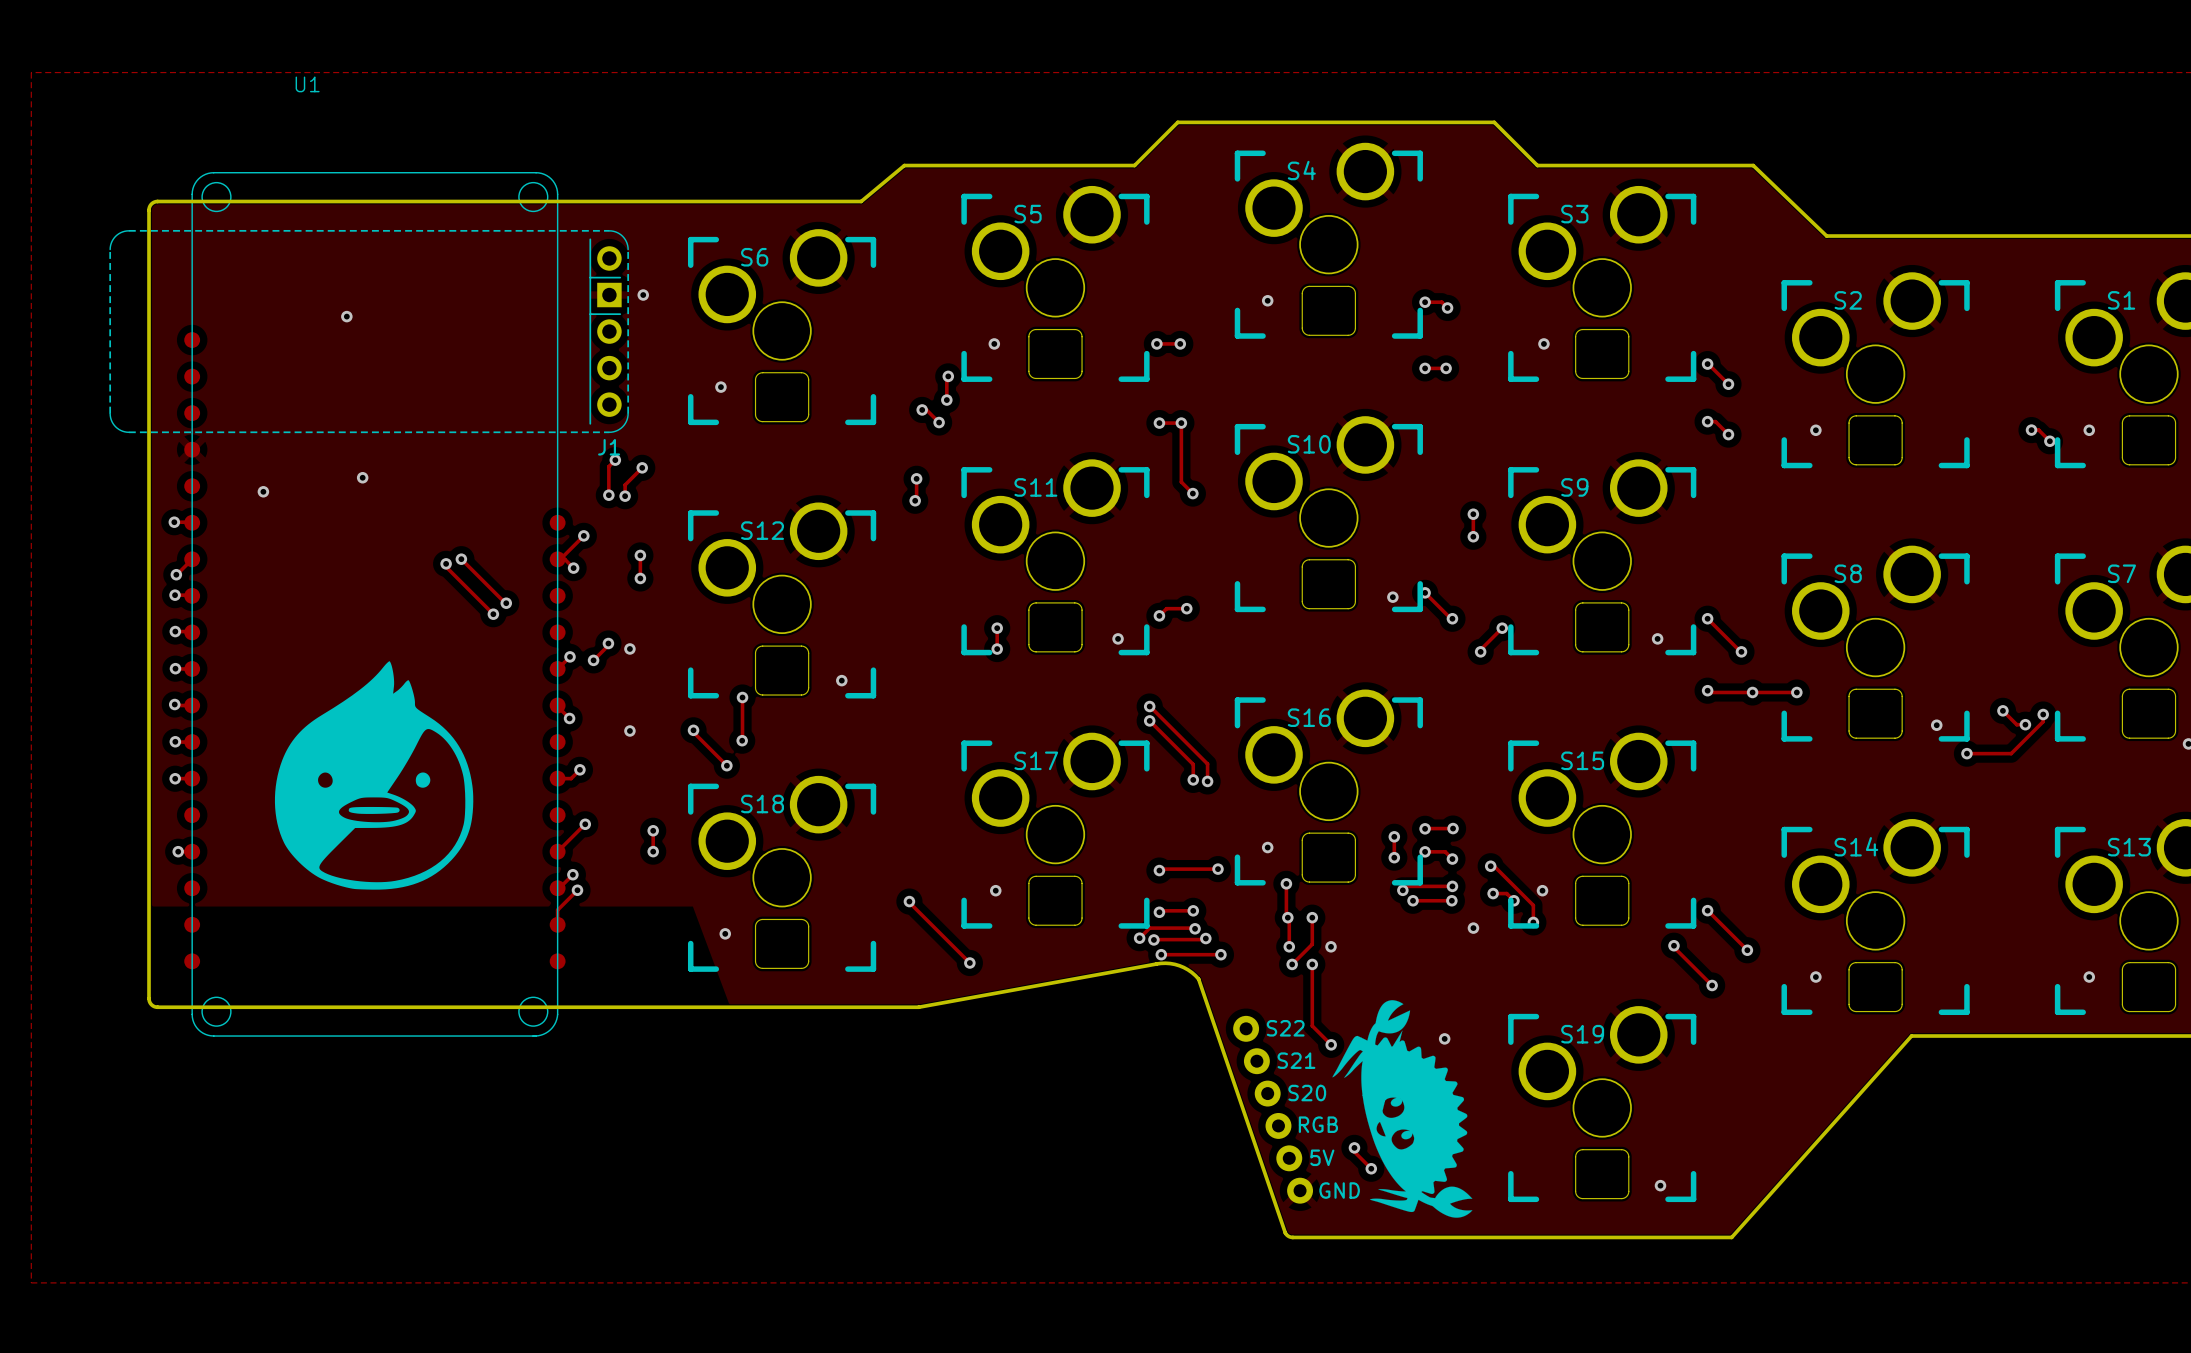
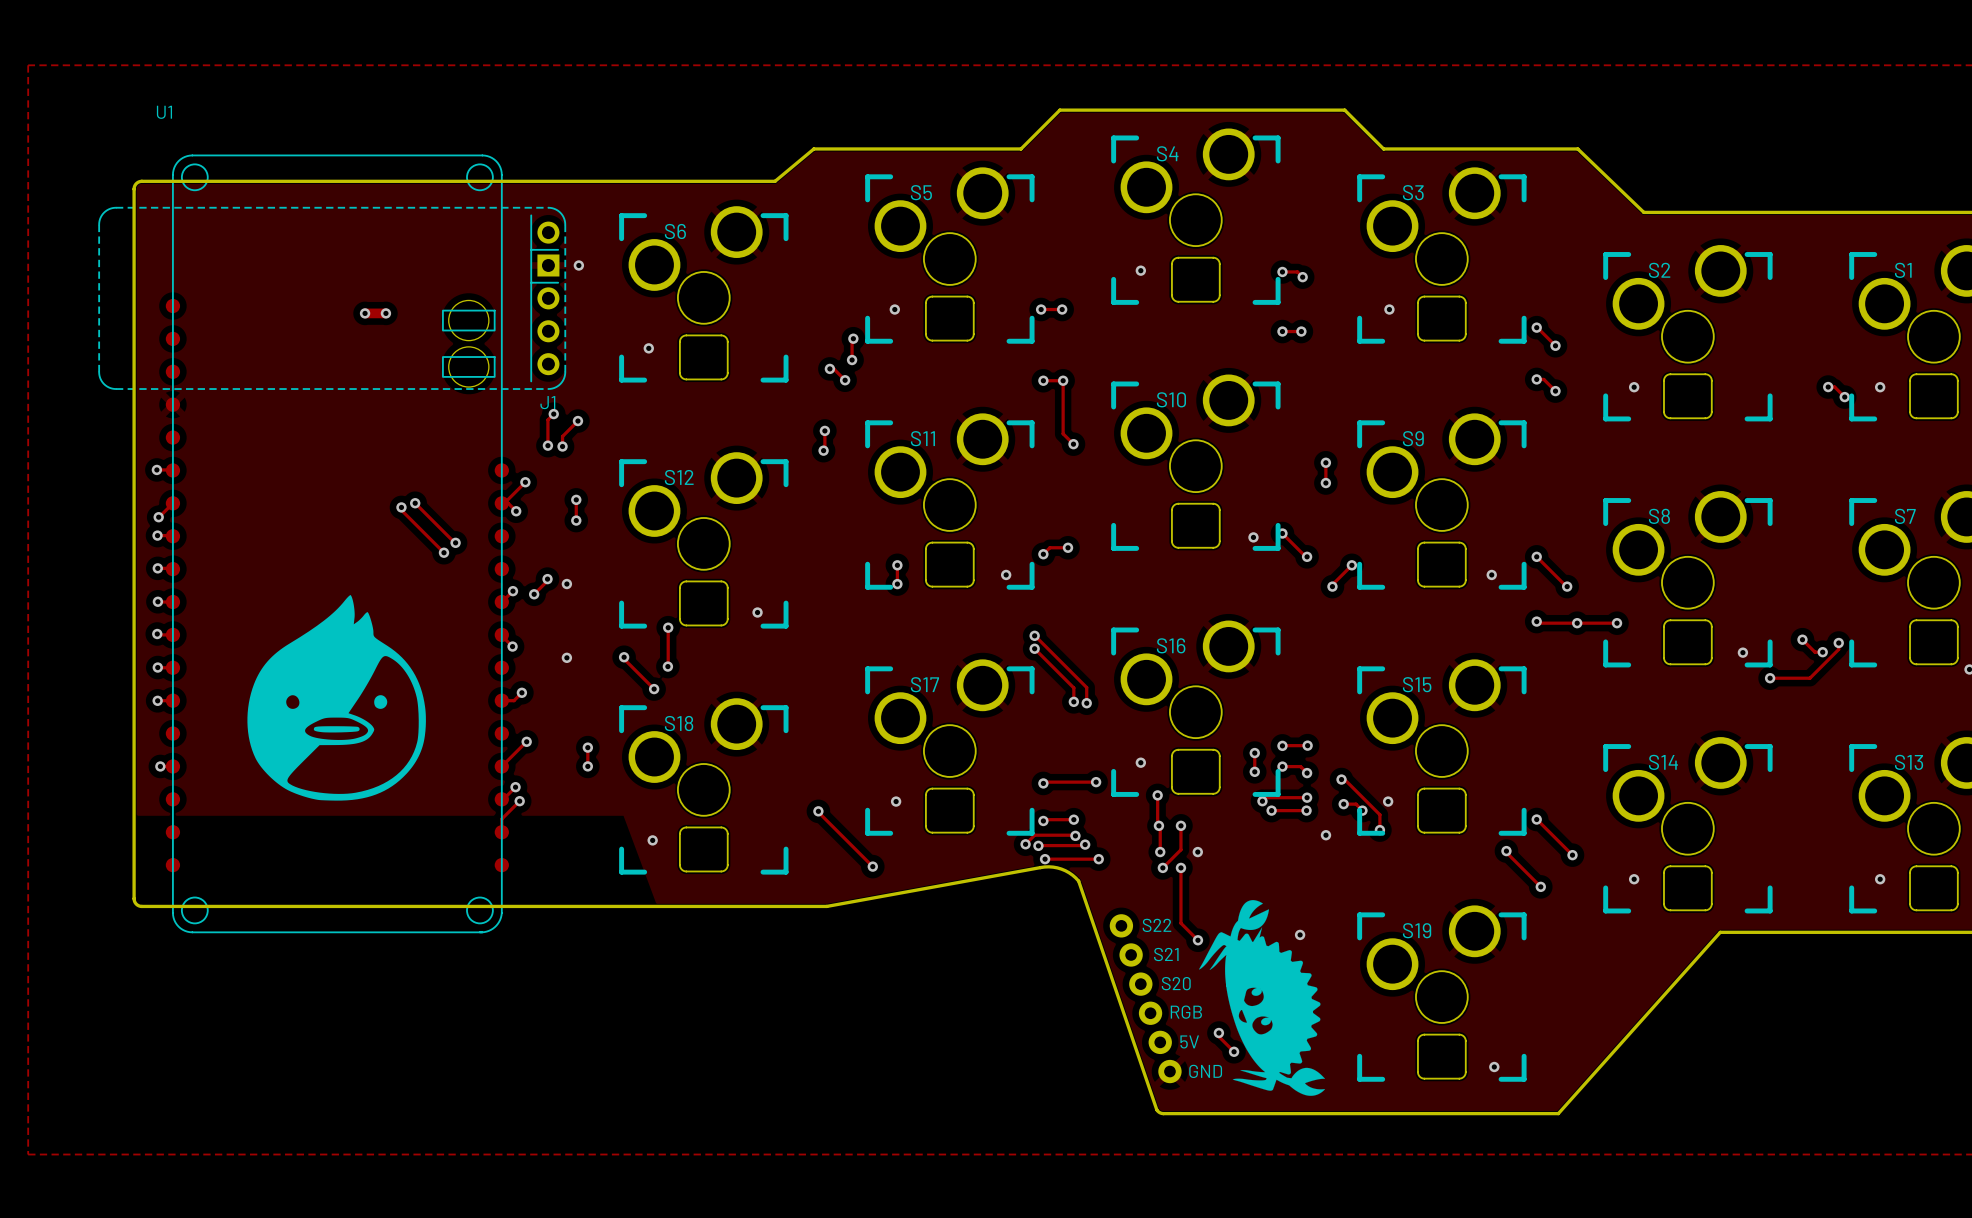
U1 name position: U1 (307, 84) -> U1 (164, 112)
U1 footprint: [184, 172, 566, 1037] -> [165, 154, 509, 933]
via: (346, 316) -> none
track: none -> (365, 313) (385, 313)
via: none -> (365, 313)
via: none -> (385, 313)
via: (362, 477) -> none
via: (263, 491) -> none

